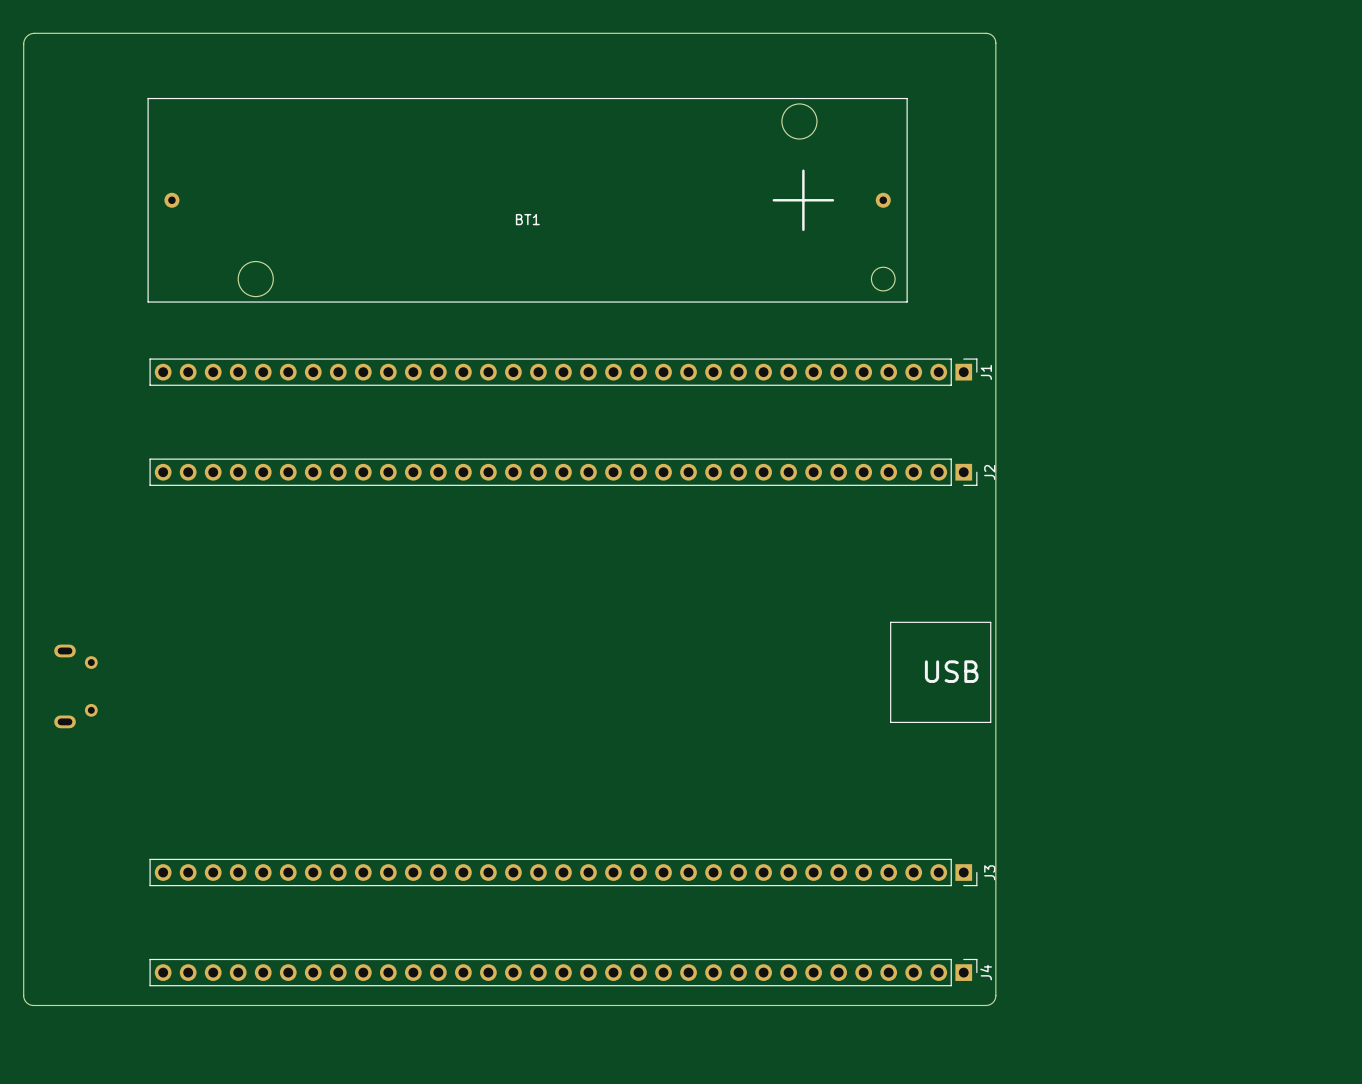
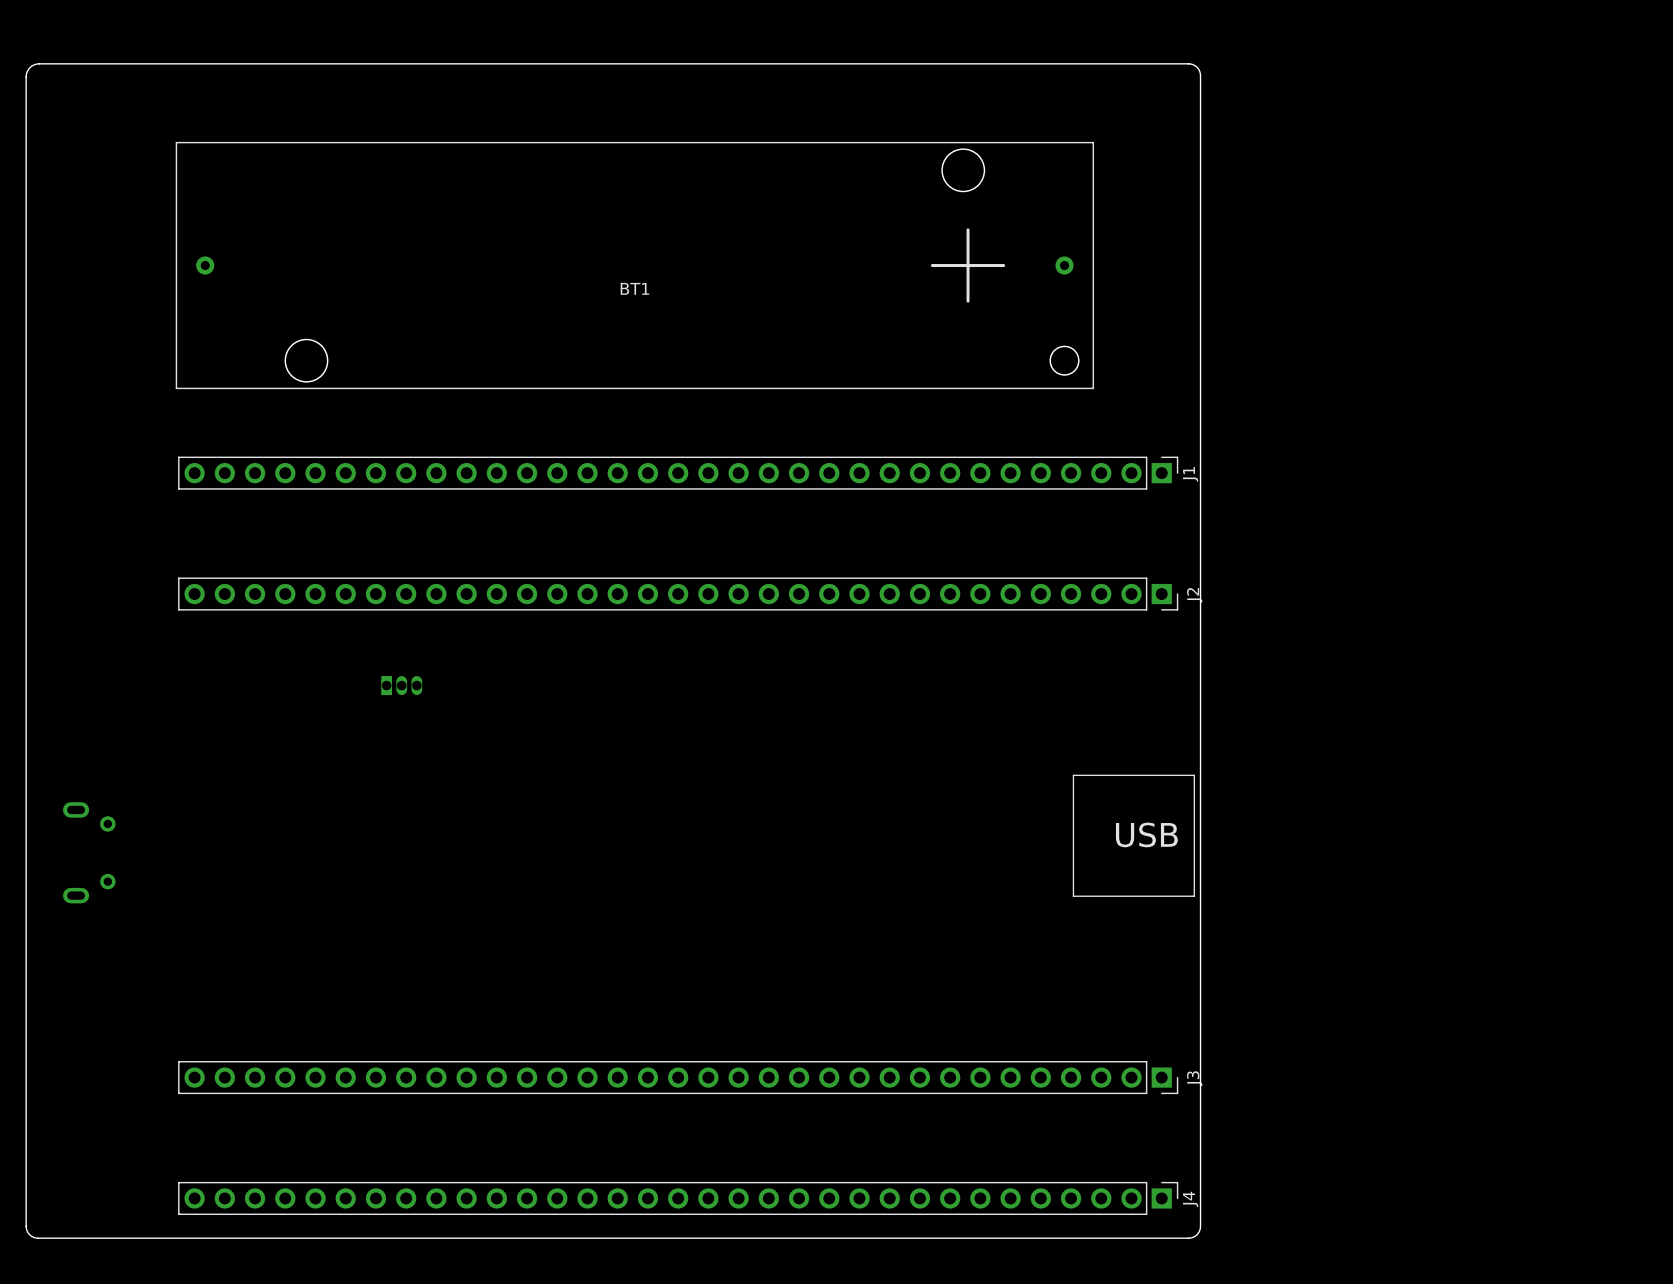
part: none -> (401, 685)

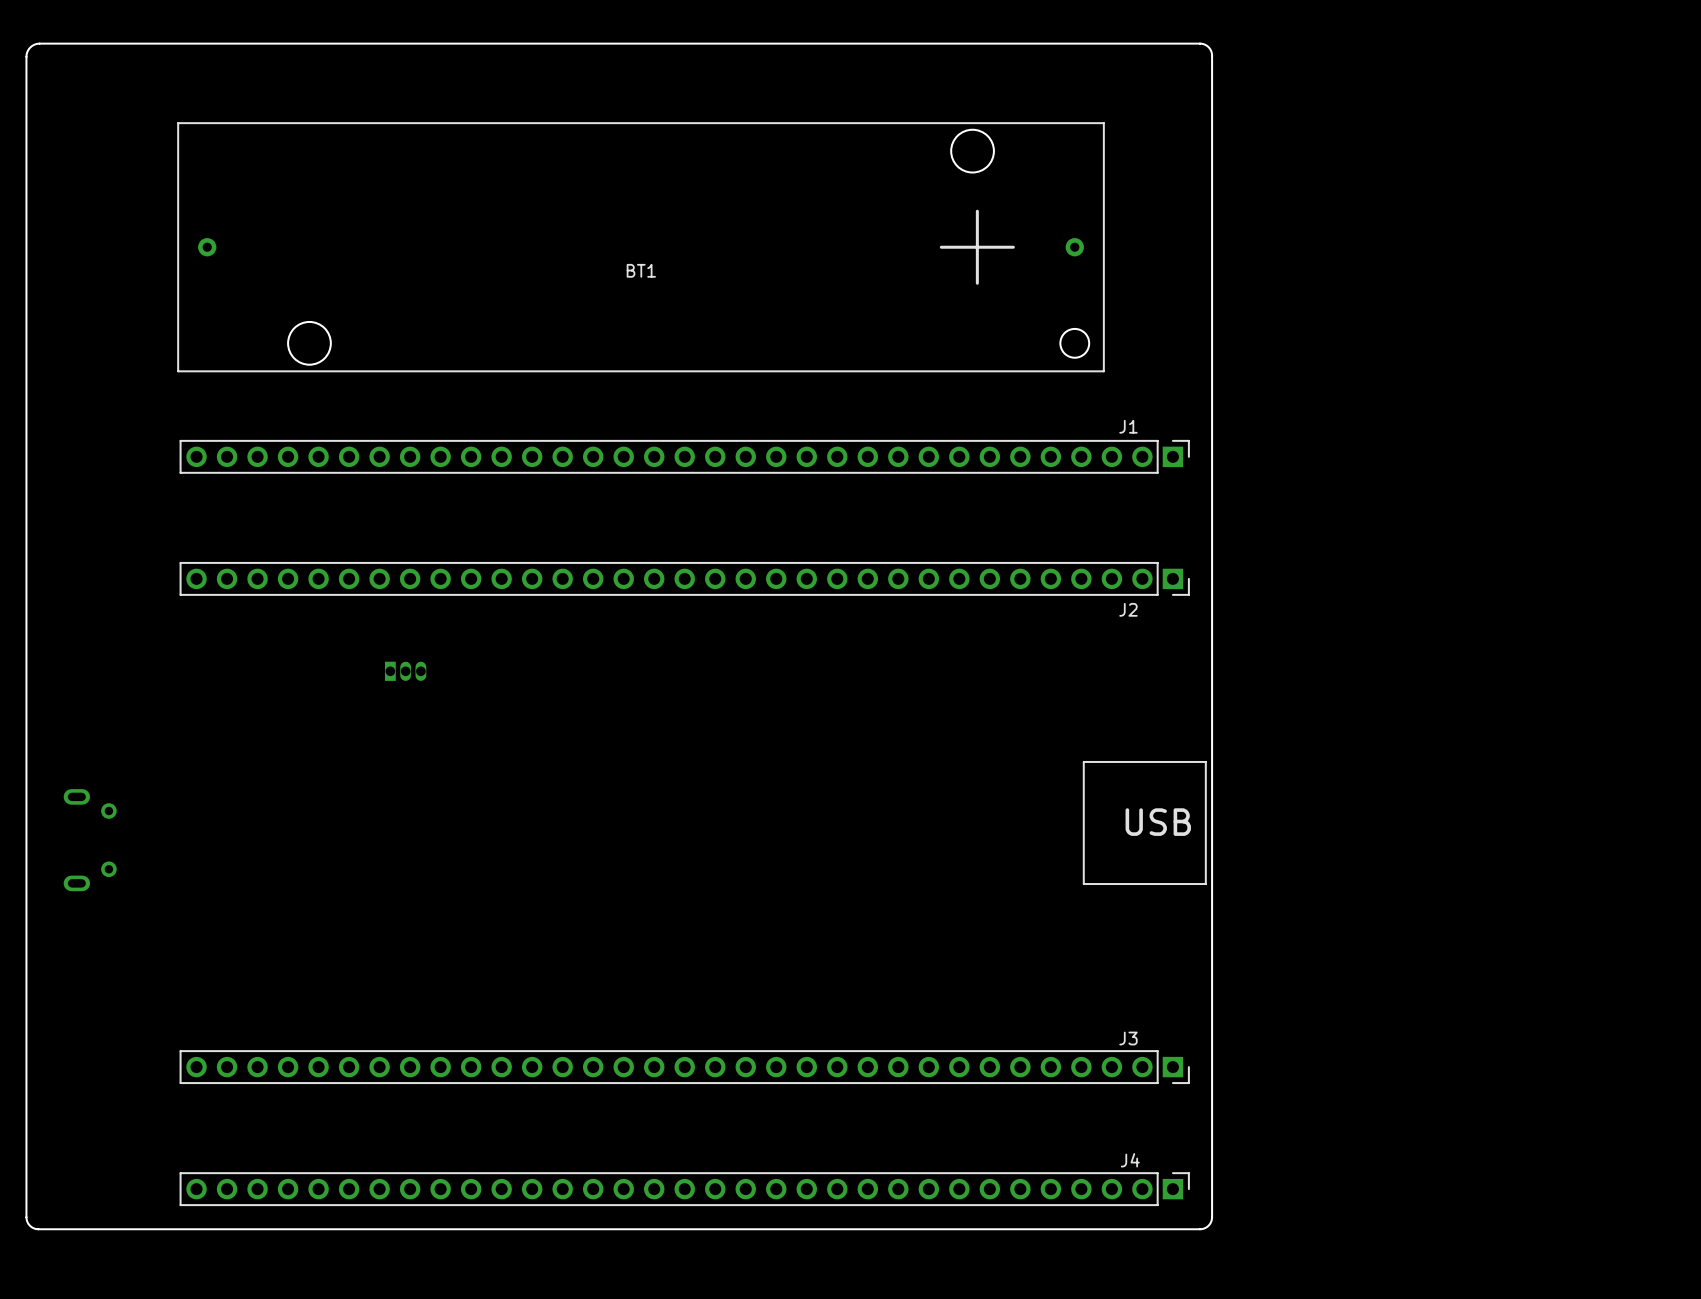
J1 name rotation: 0° (1190, 474) -> 90° clockwise (1128, 426)
J1 name position: J1 (1190, 474) -> J1 (1128, 426)
J2 name rotation: 0° (1194, 595) -> 90° clockwise (1128, 609)
J2 name position: J2 (1194, 595) -> J2 (1128, 609)
J3 name rotation: 0° (1194, 1078) -> 90° clockwise (1128, 1038)
J3 name position: J3 (1194, 1078) -> J3 (1128, 1038)
J4 name rotation: 0° (1190, 1199) -> 90° clockwise (1130, 1160)
J4 name position: J4 (1190, 1199) -> J4 (1130, 1160)

